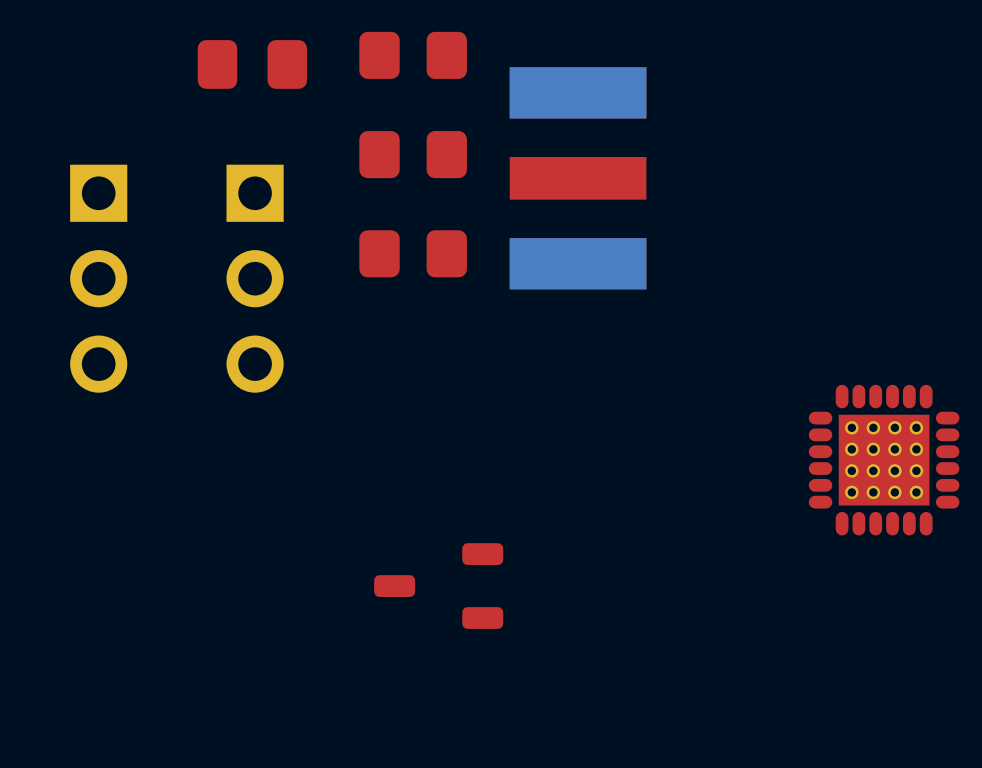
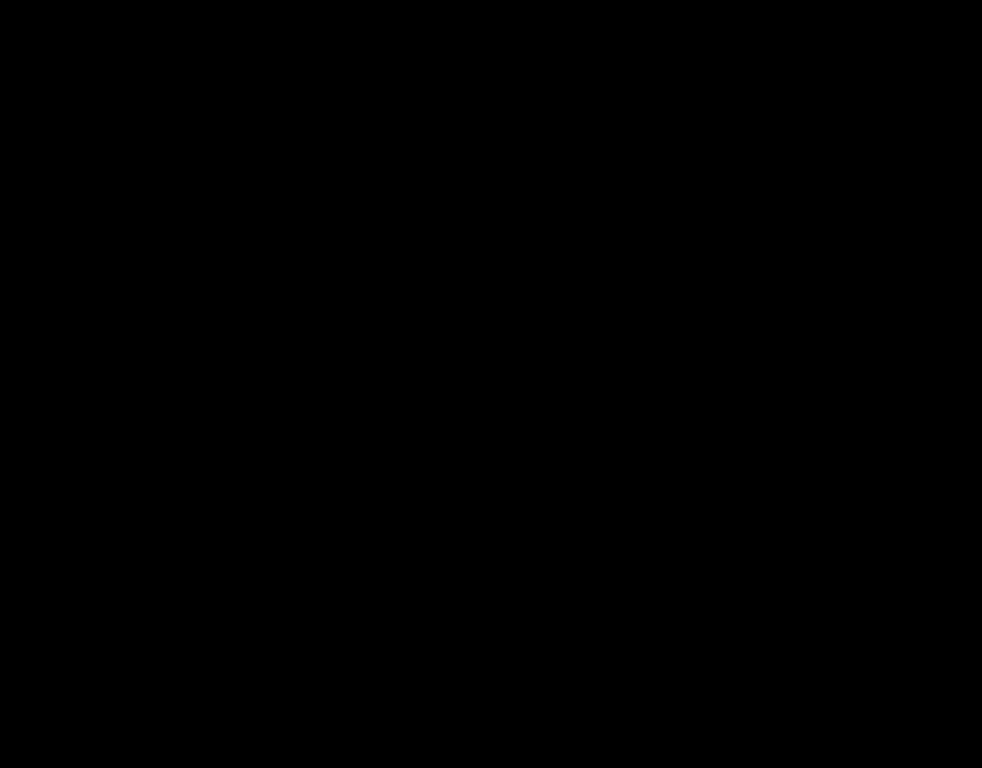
part: (413, 55) -> none
part: (252, 64) -> none
part: (413, 154) -> none
part: (578, 178) -> none
part: (413, 253) -> none
part: (98, 278) -> none
part: (255, 278) -> none
part: (884, 460) -> none
part: (438, 586) -> none

